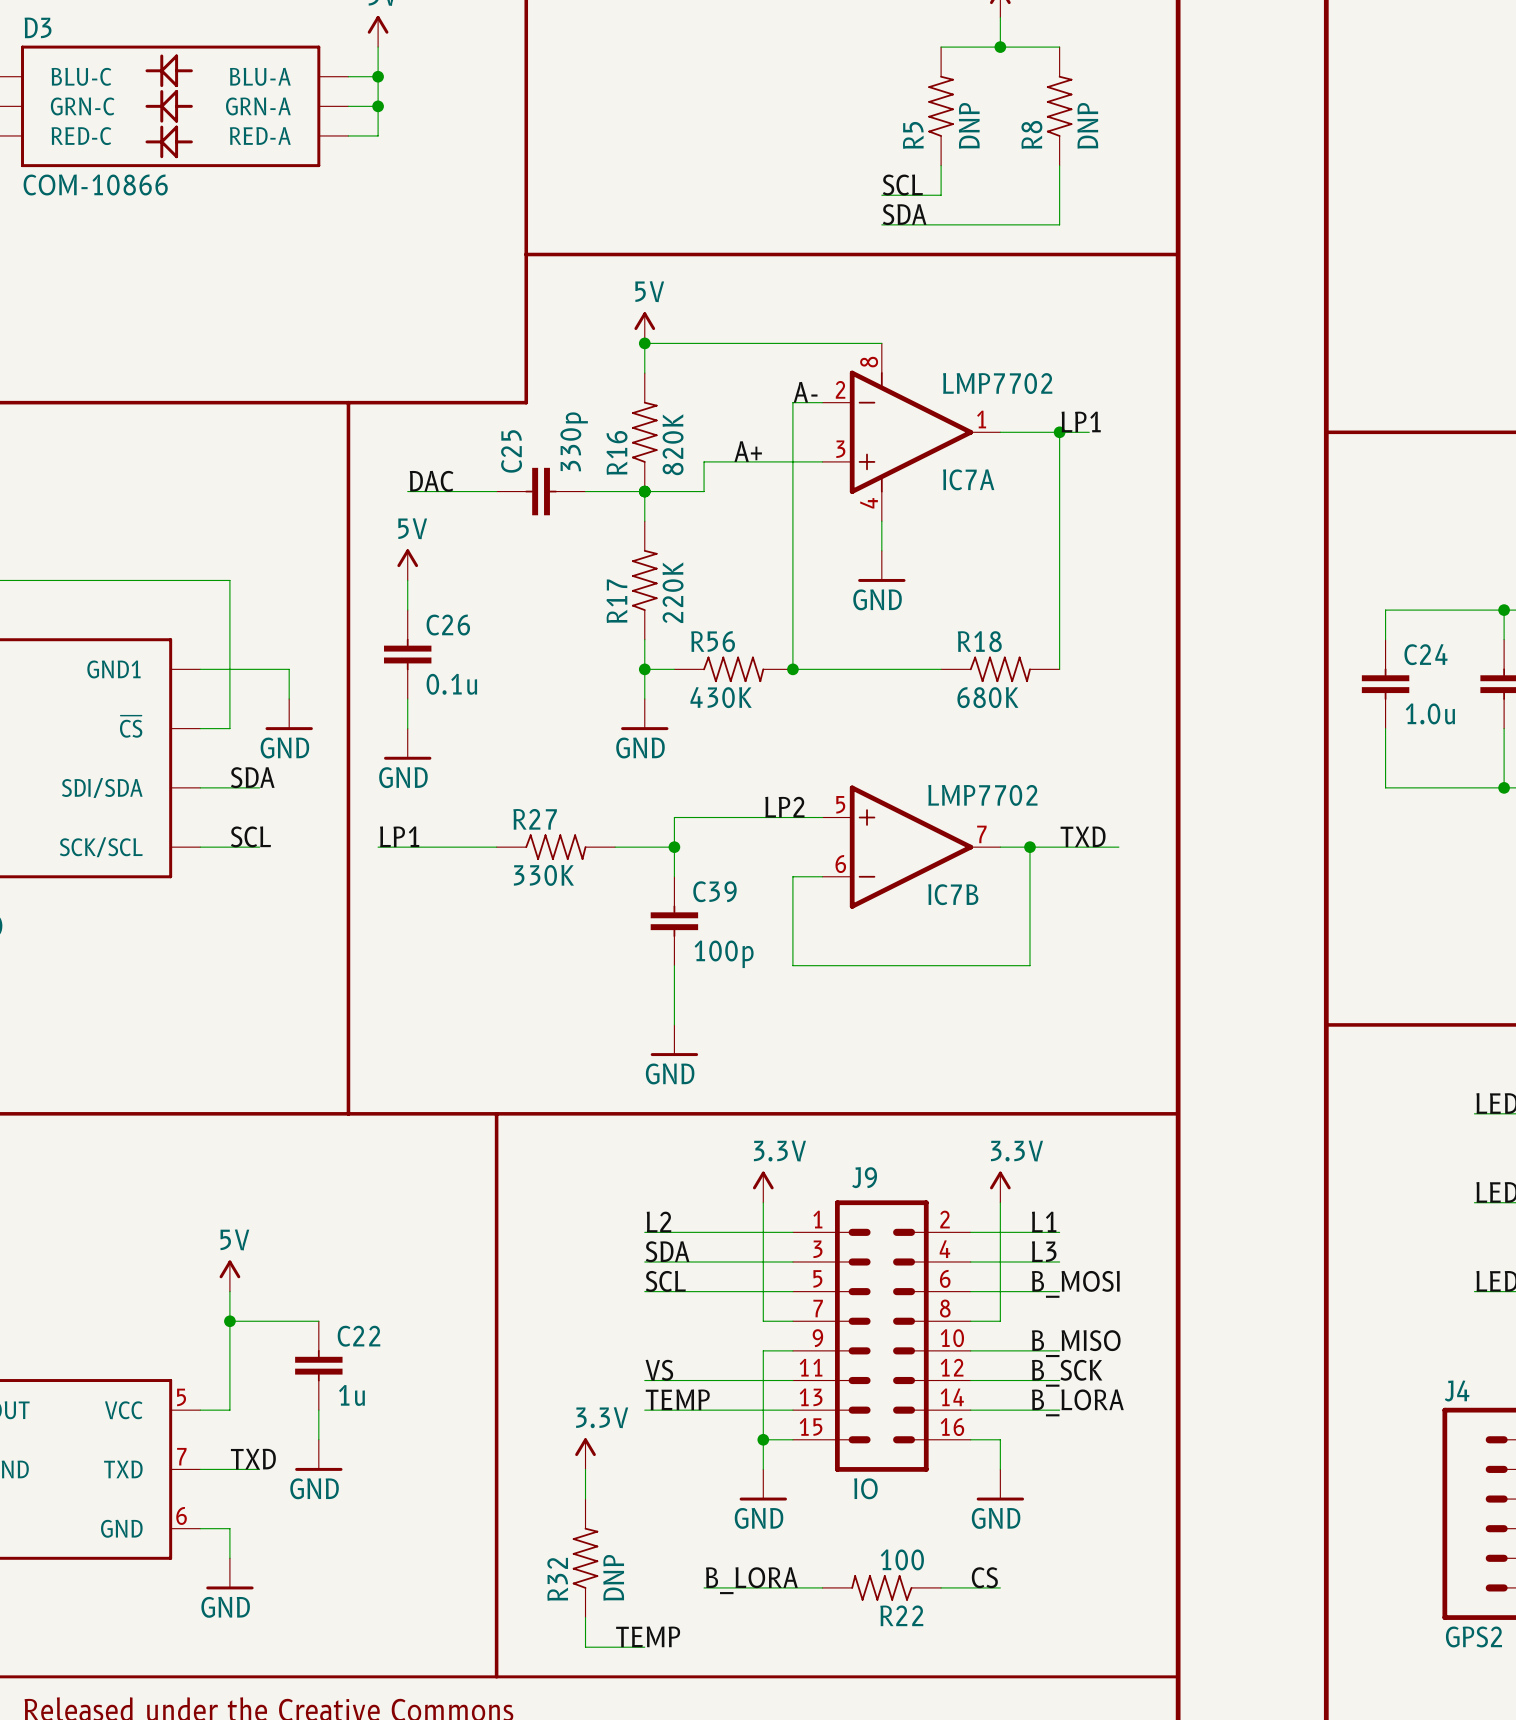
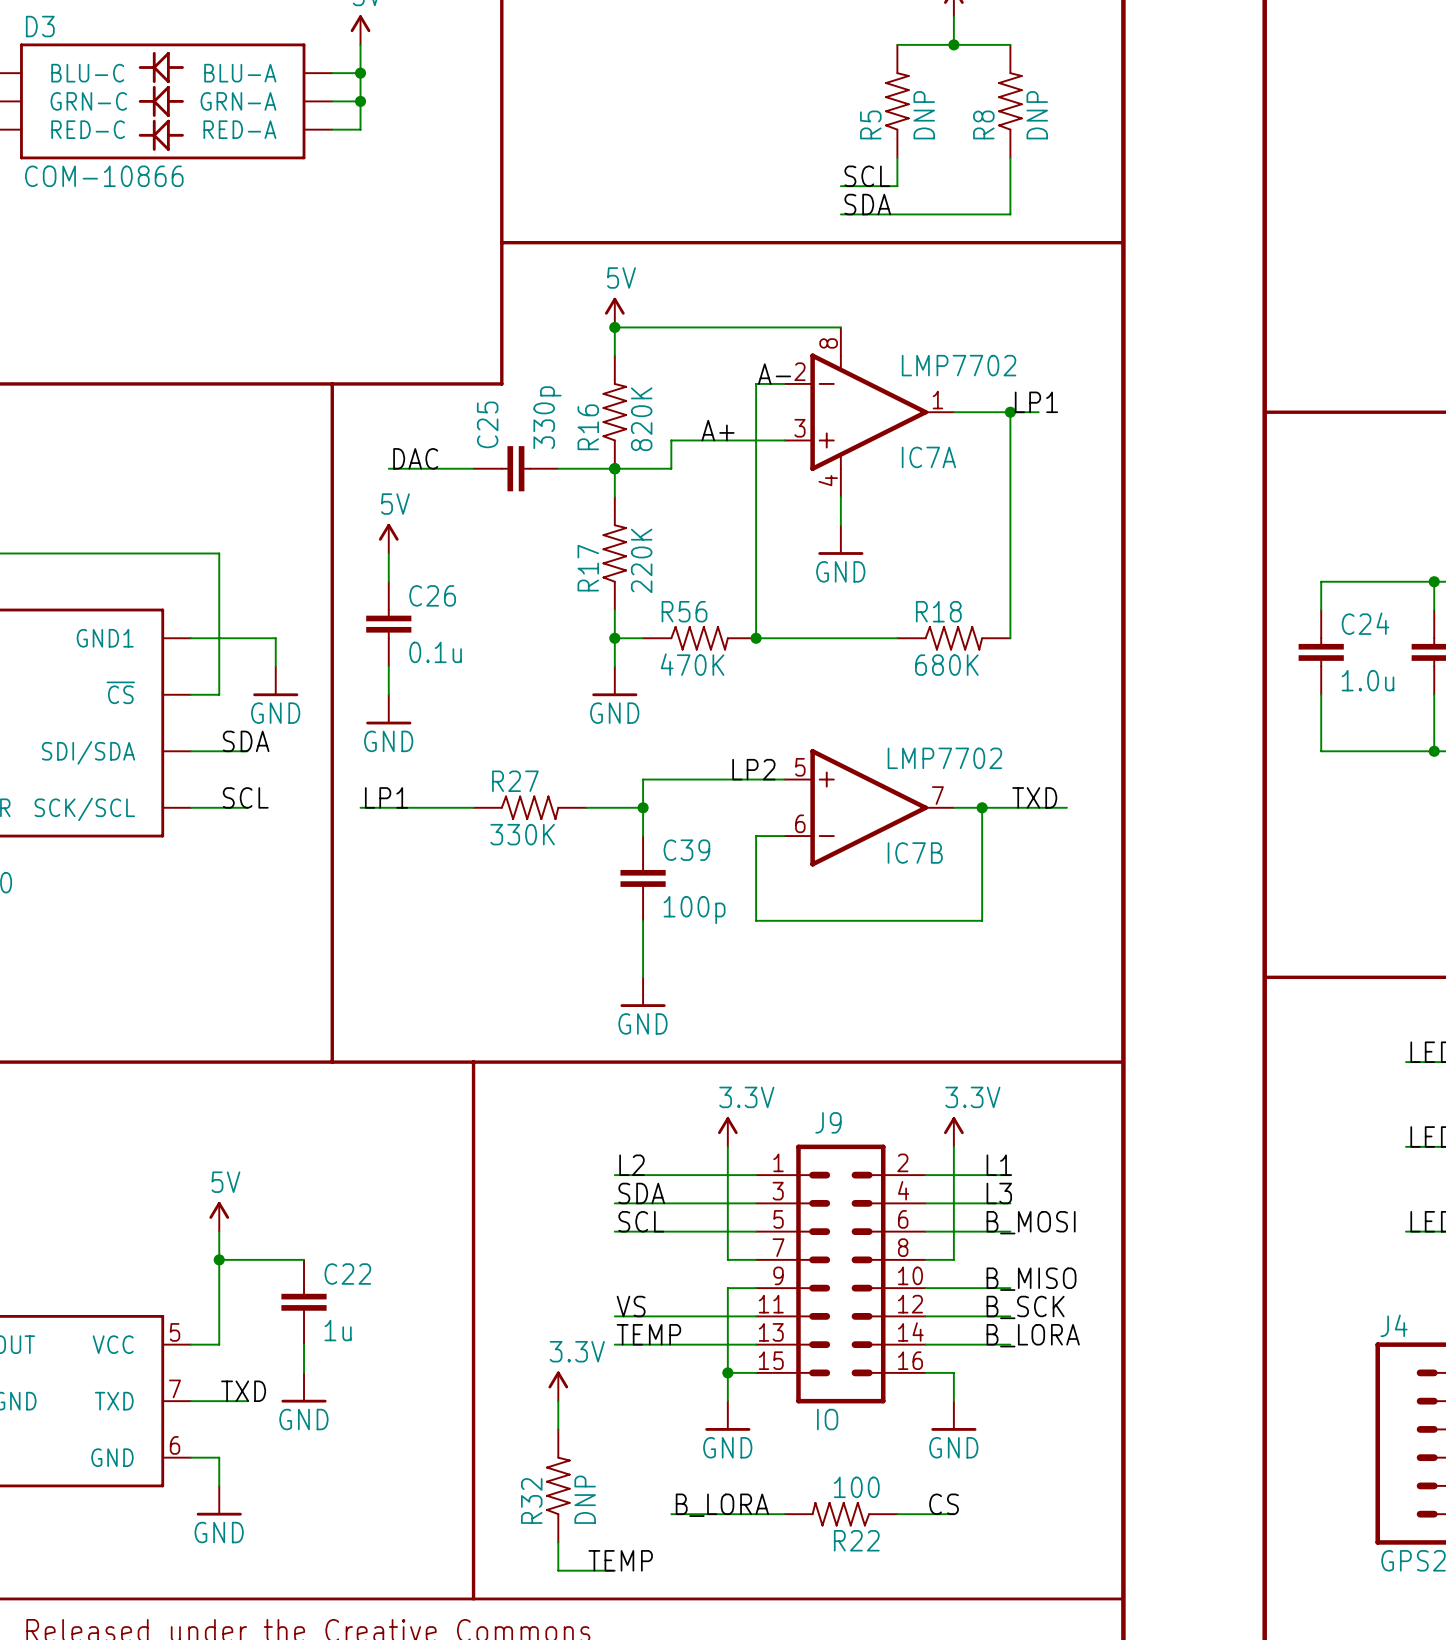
R56 value: 430K (721, 697) -> 470K (692, 664)

